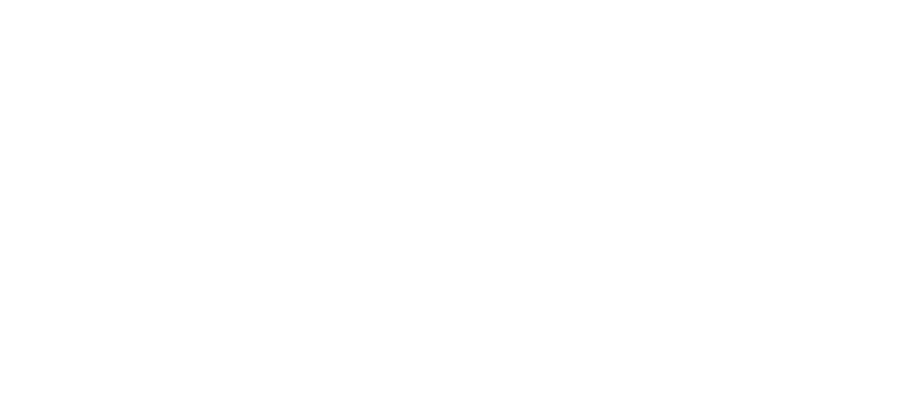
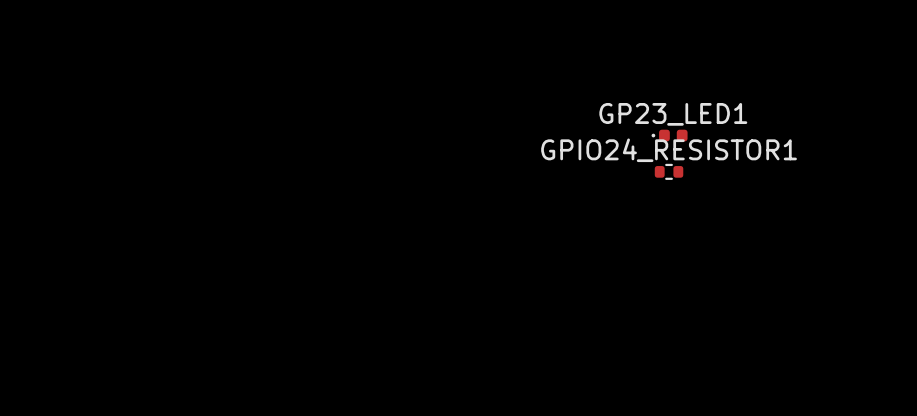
GP23_LED1: none -> (669, 135)
GPIO24_RESISTOR1: none -> (669, 171)

